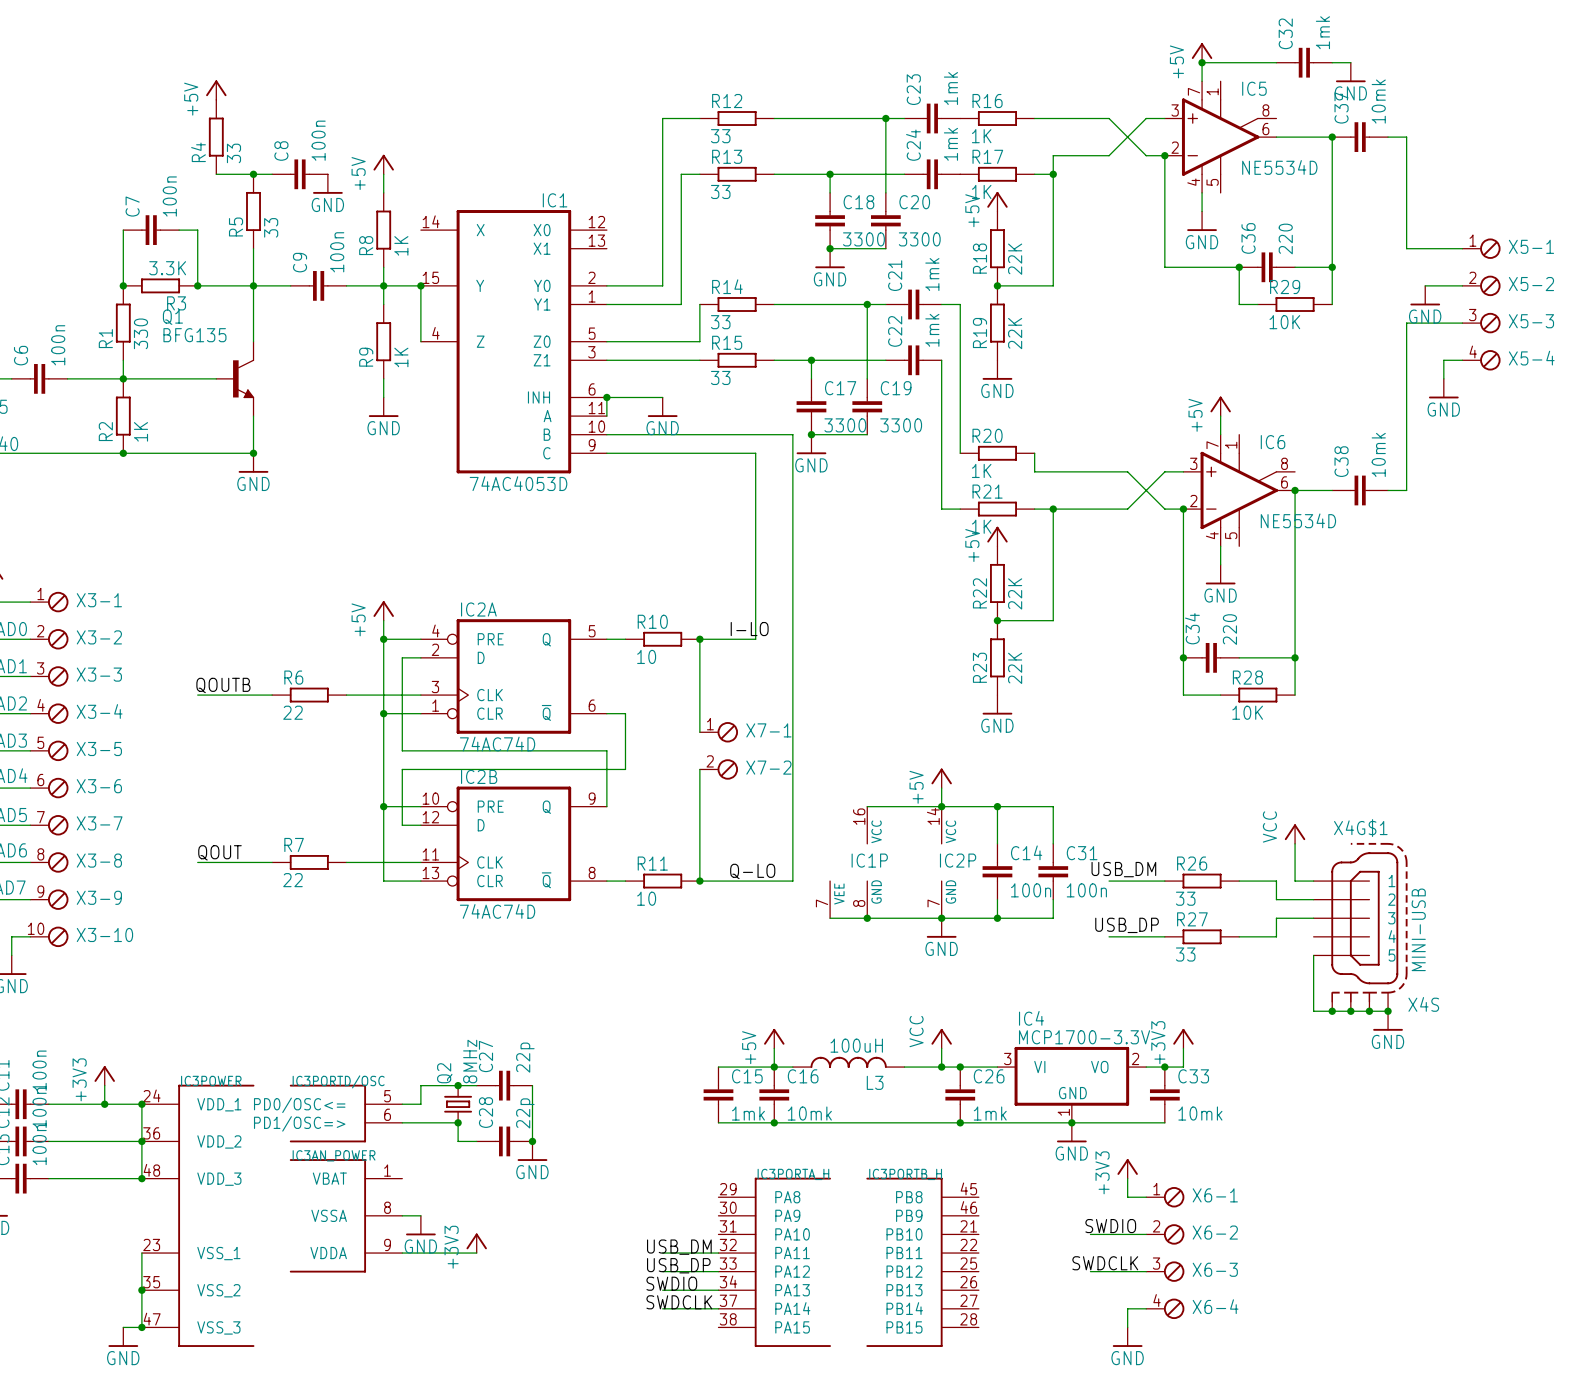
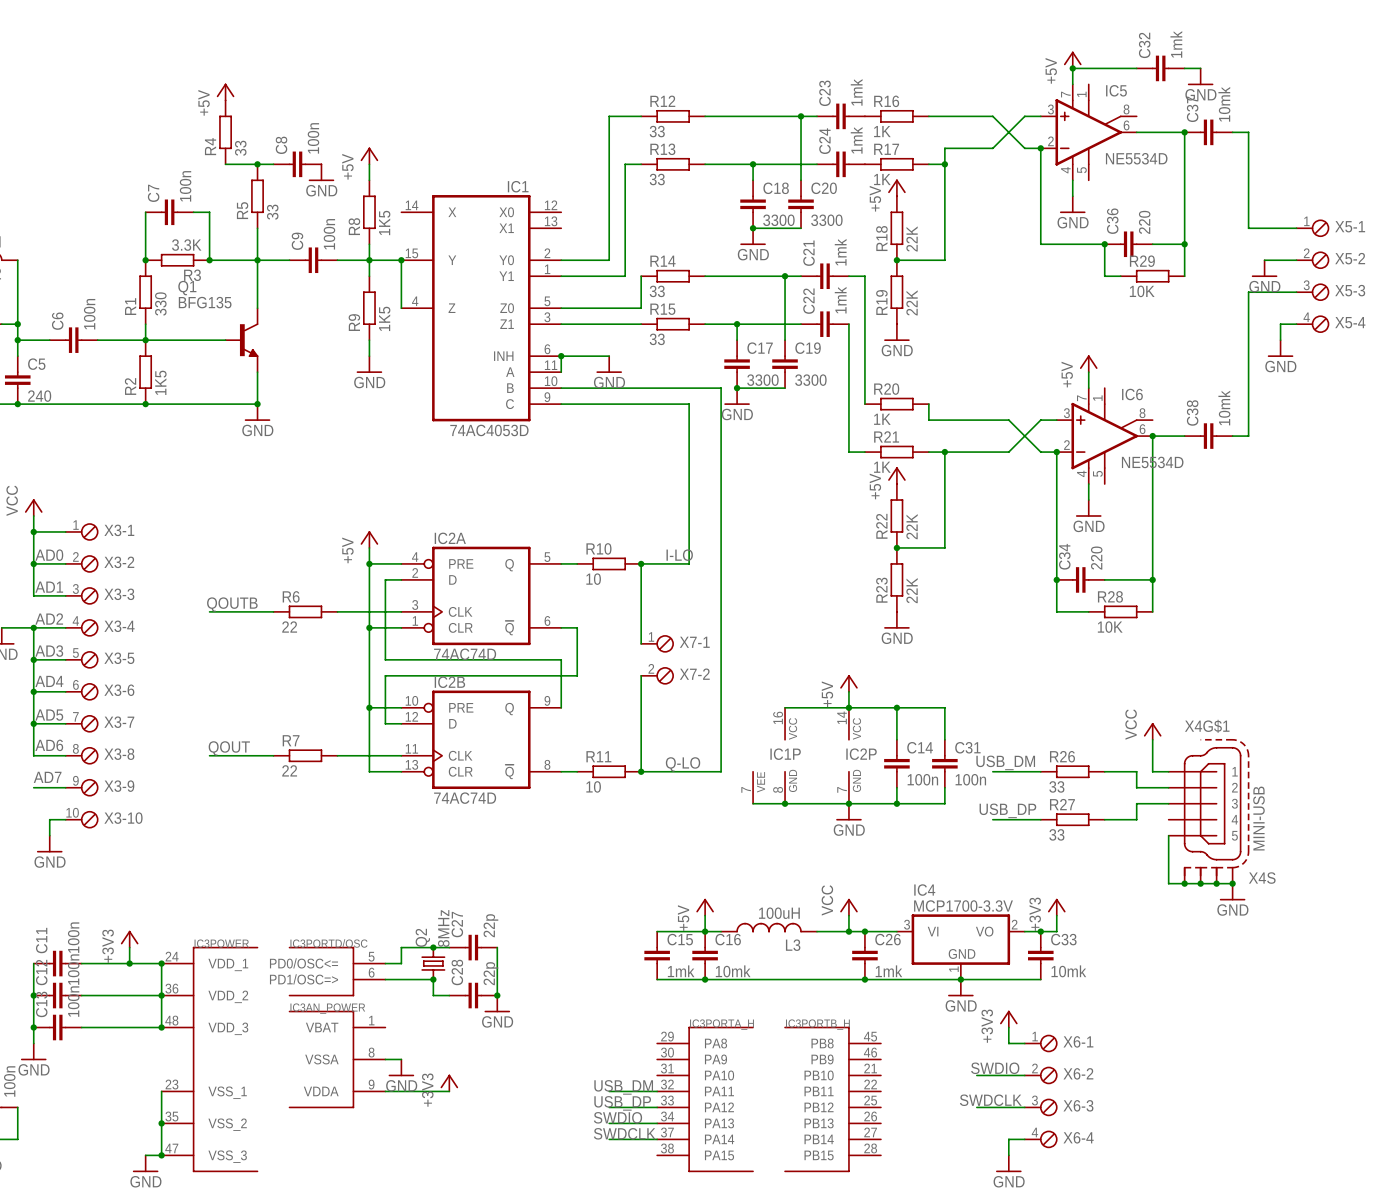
R8 value: 1K (401, 245) -> 1K5 (384, 222)
R9 value: 1K (401, 357) -> 1K5 (384, 318)
R2 value: 1K (140, 431) -> 1K5 (160, 382)

